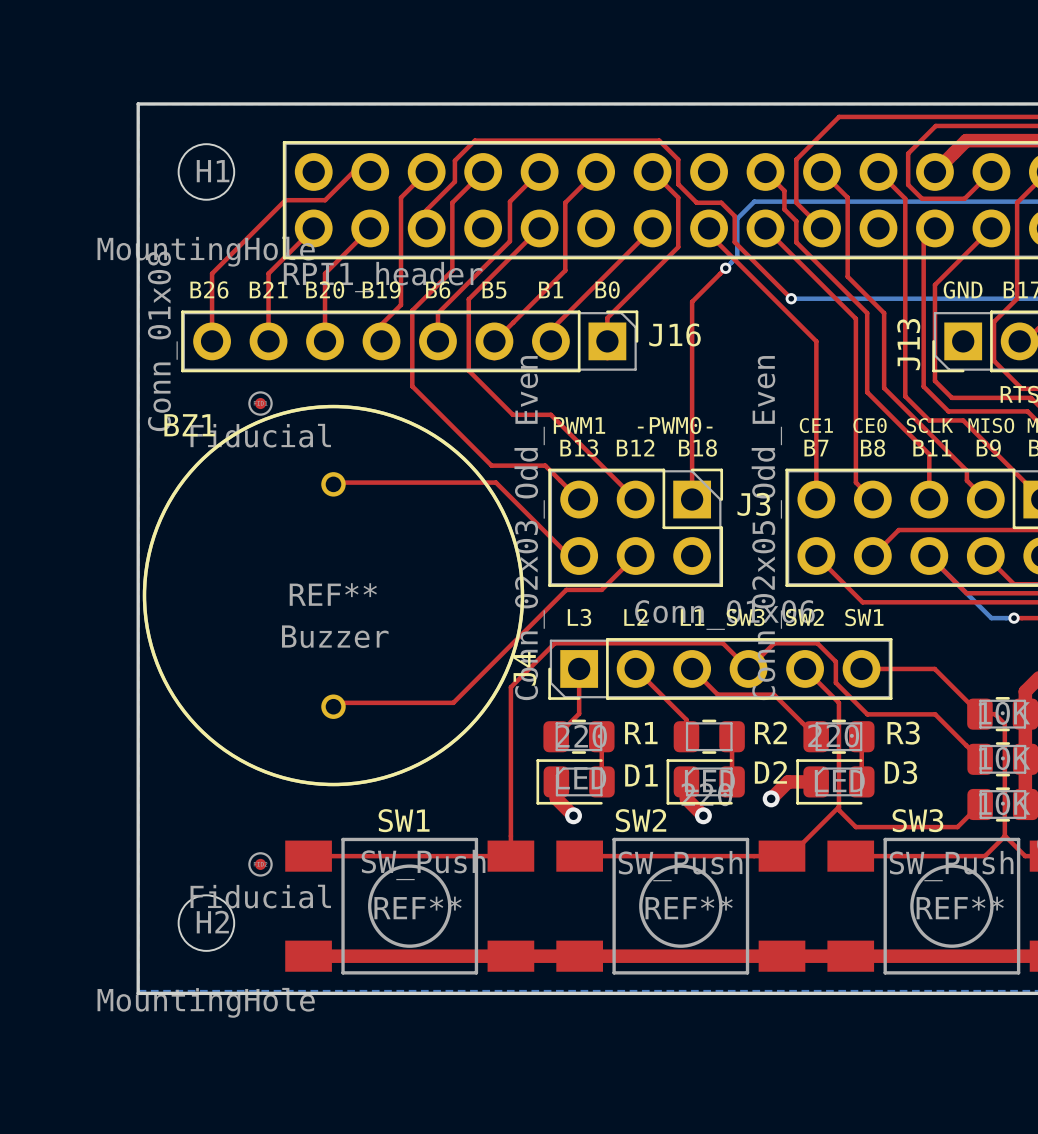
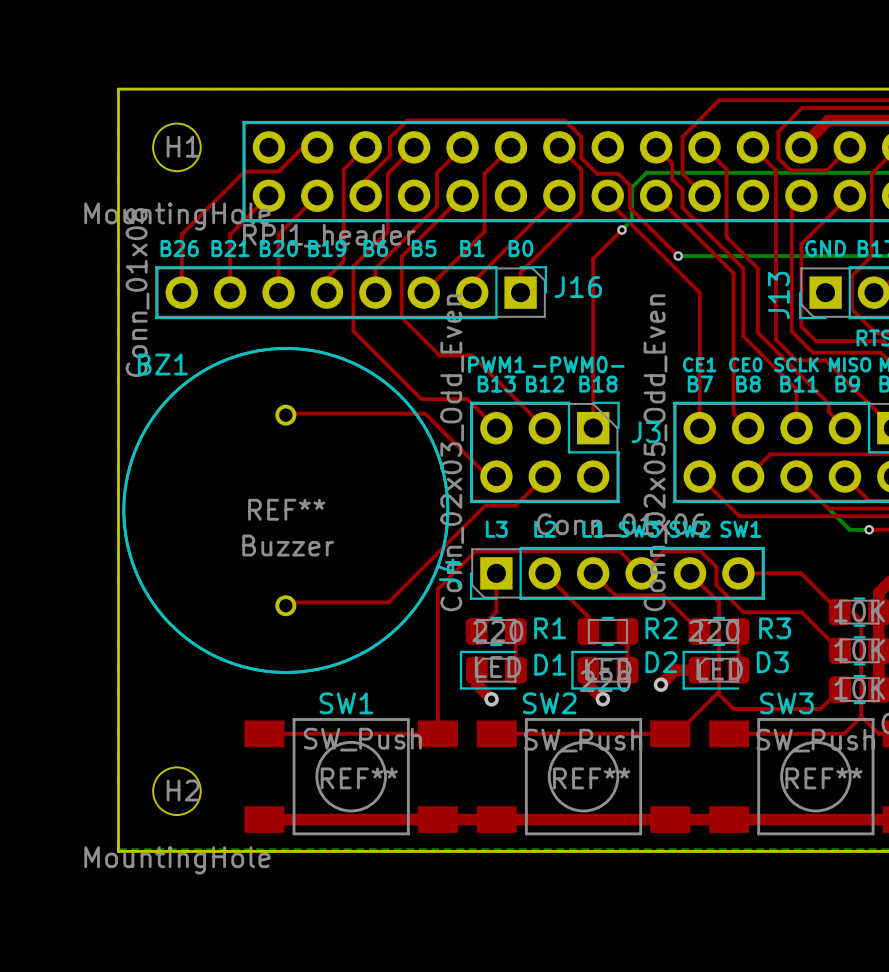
part: Fiducial (260, 403) -> none
part: Fiducial (260, 864) -> none

